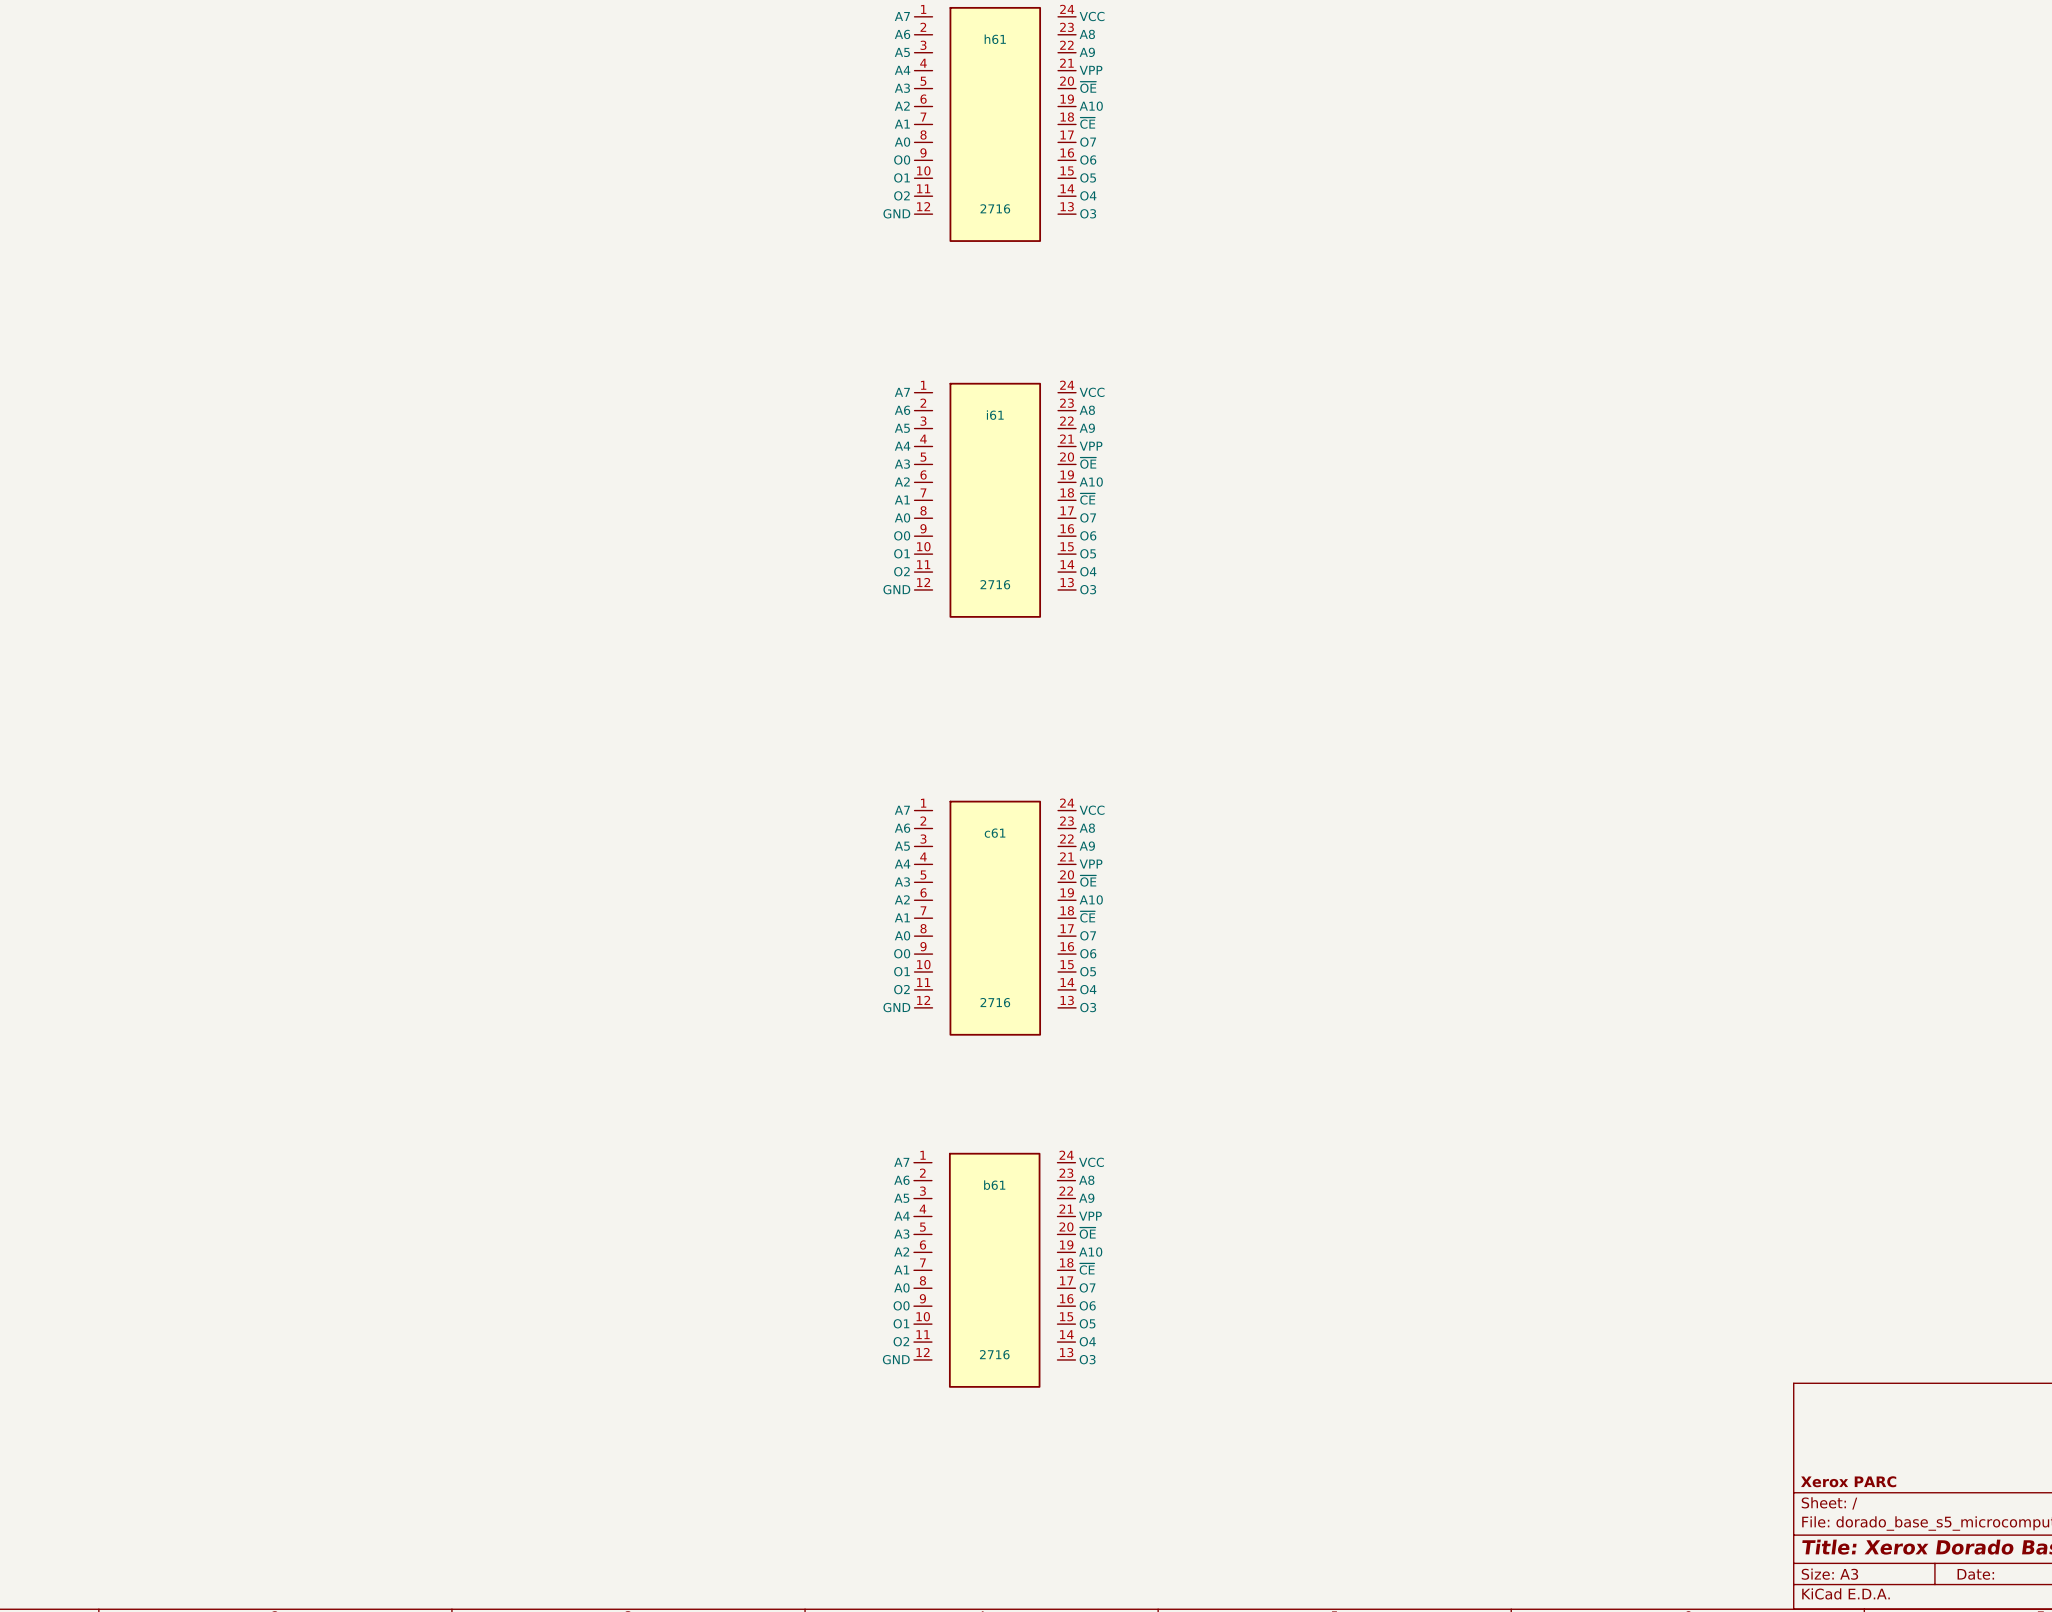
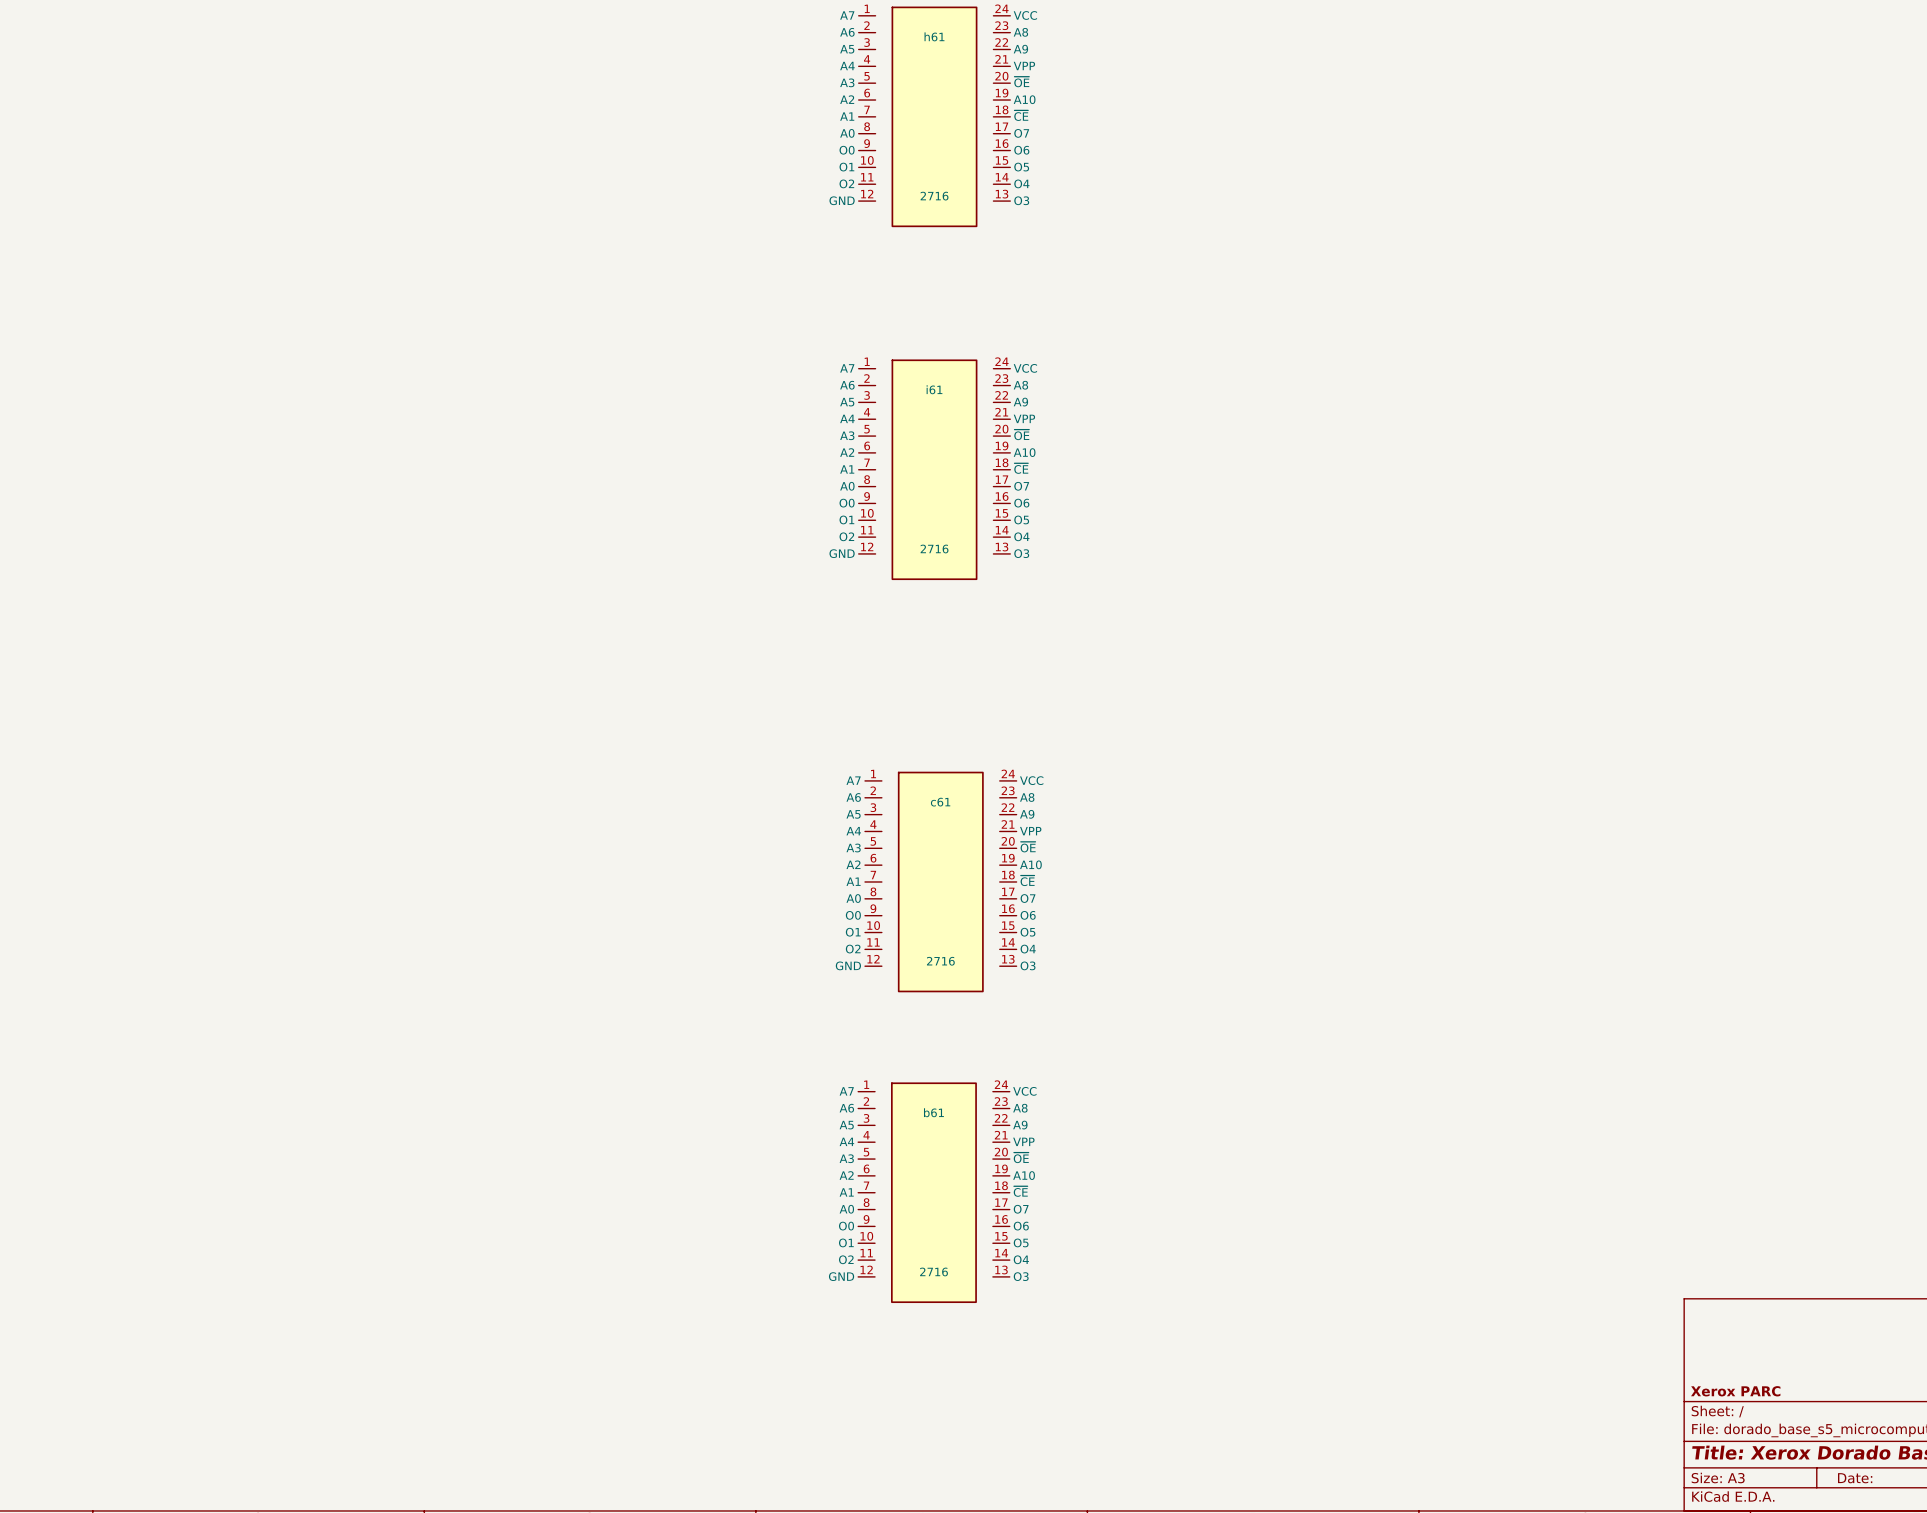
c61 position: (995, 918) -> (940, 881)

